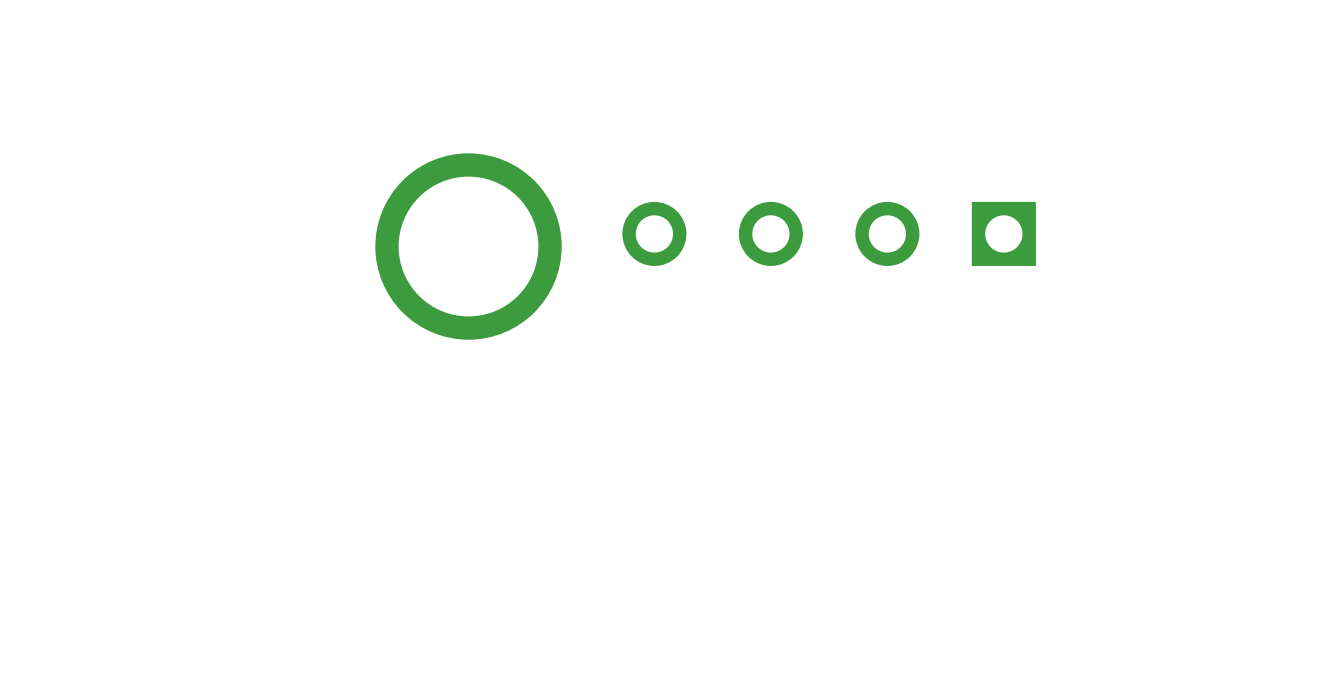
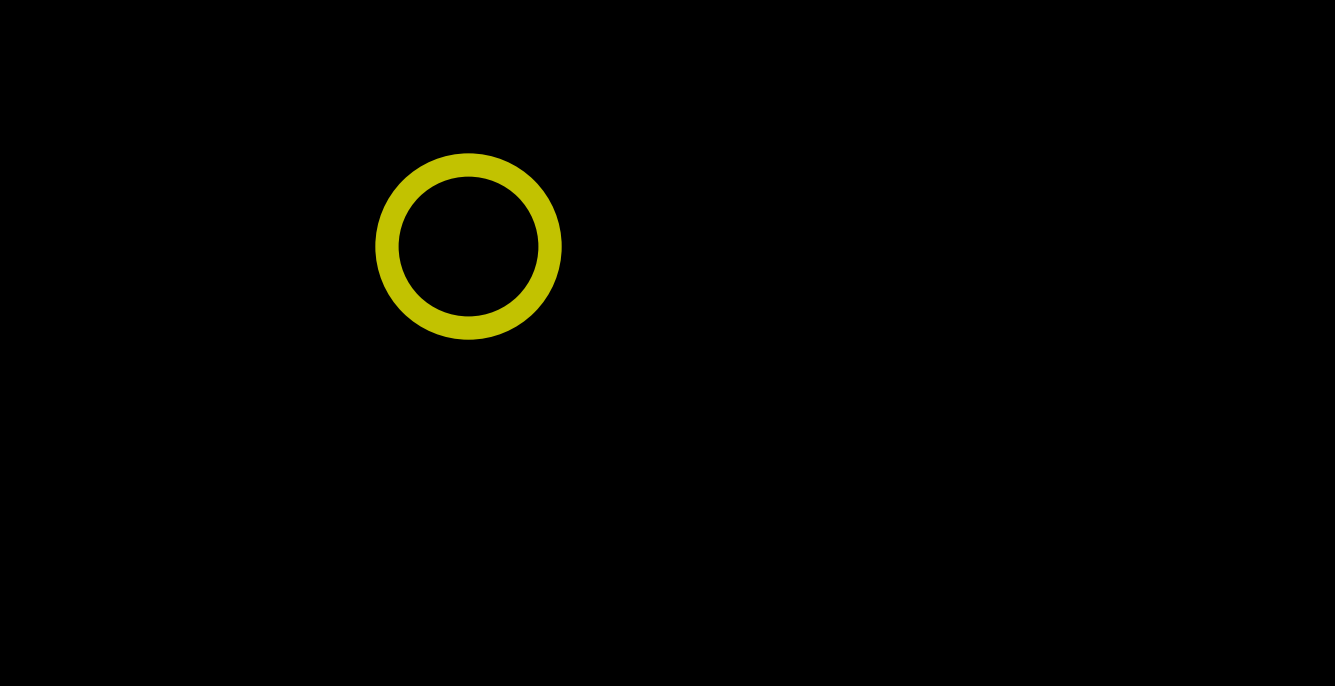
part: (829, 233) -> none

